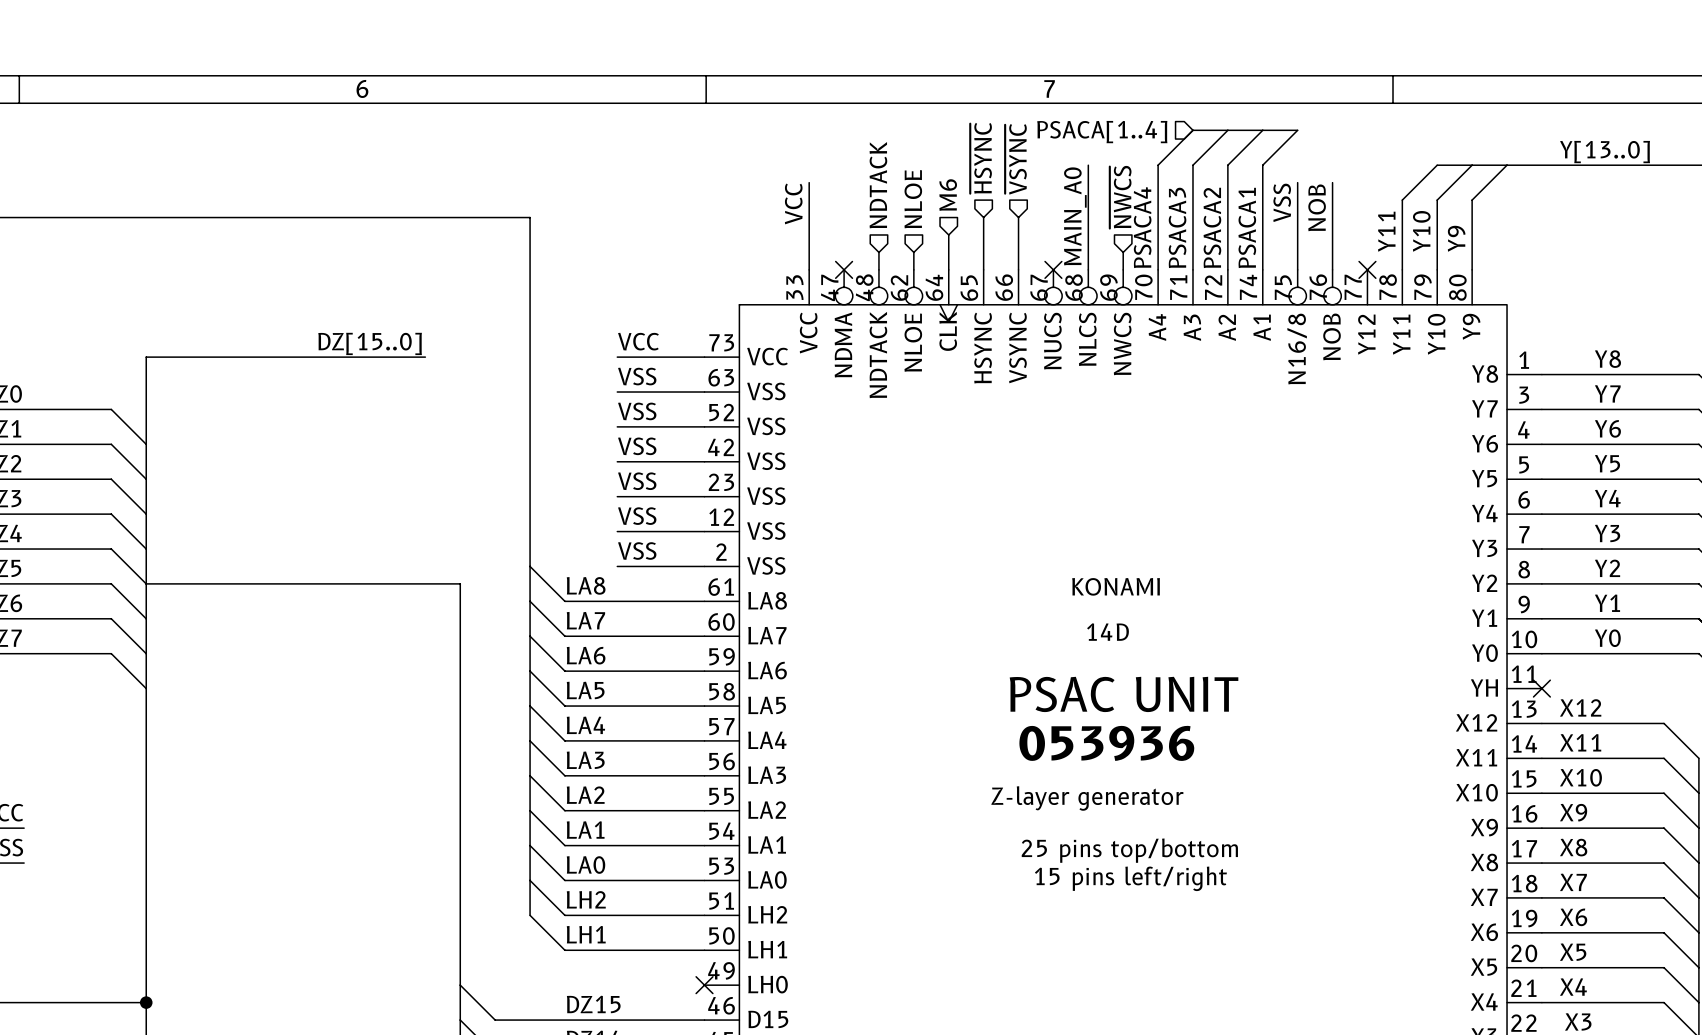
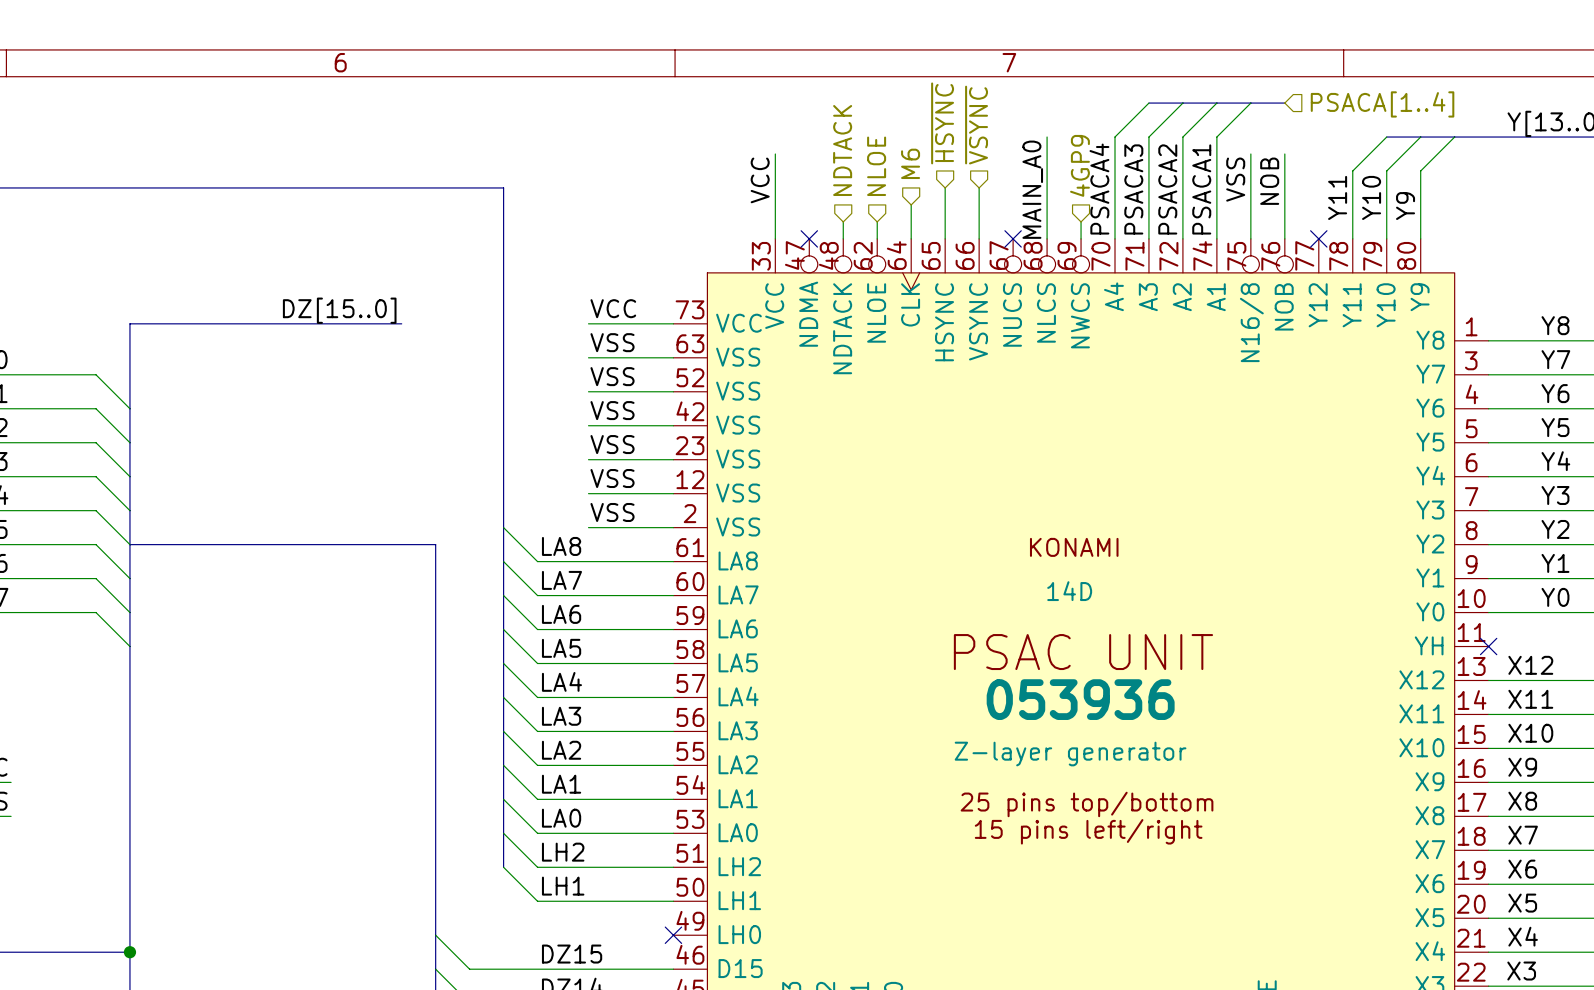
bus: none -> (1250, 103) (1284, 103)
hierarchical label rotation: 0° (1102, 132) -> 180° (1382, 104)
hierarchical label position: PSACA[1..4] (1102, 132) -> PSACA[1..4] (1382, 104)
hierarchical label: ~{NWCS} (1120, 197) -> 4GP9 (1079, 165)

